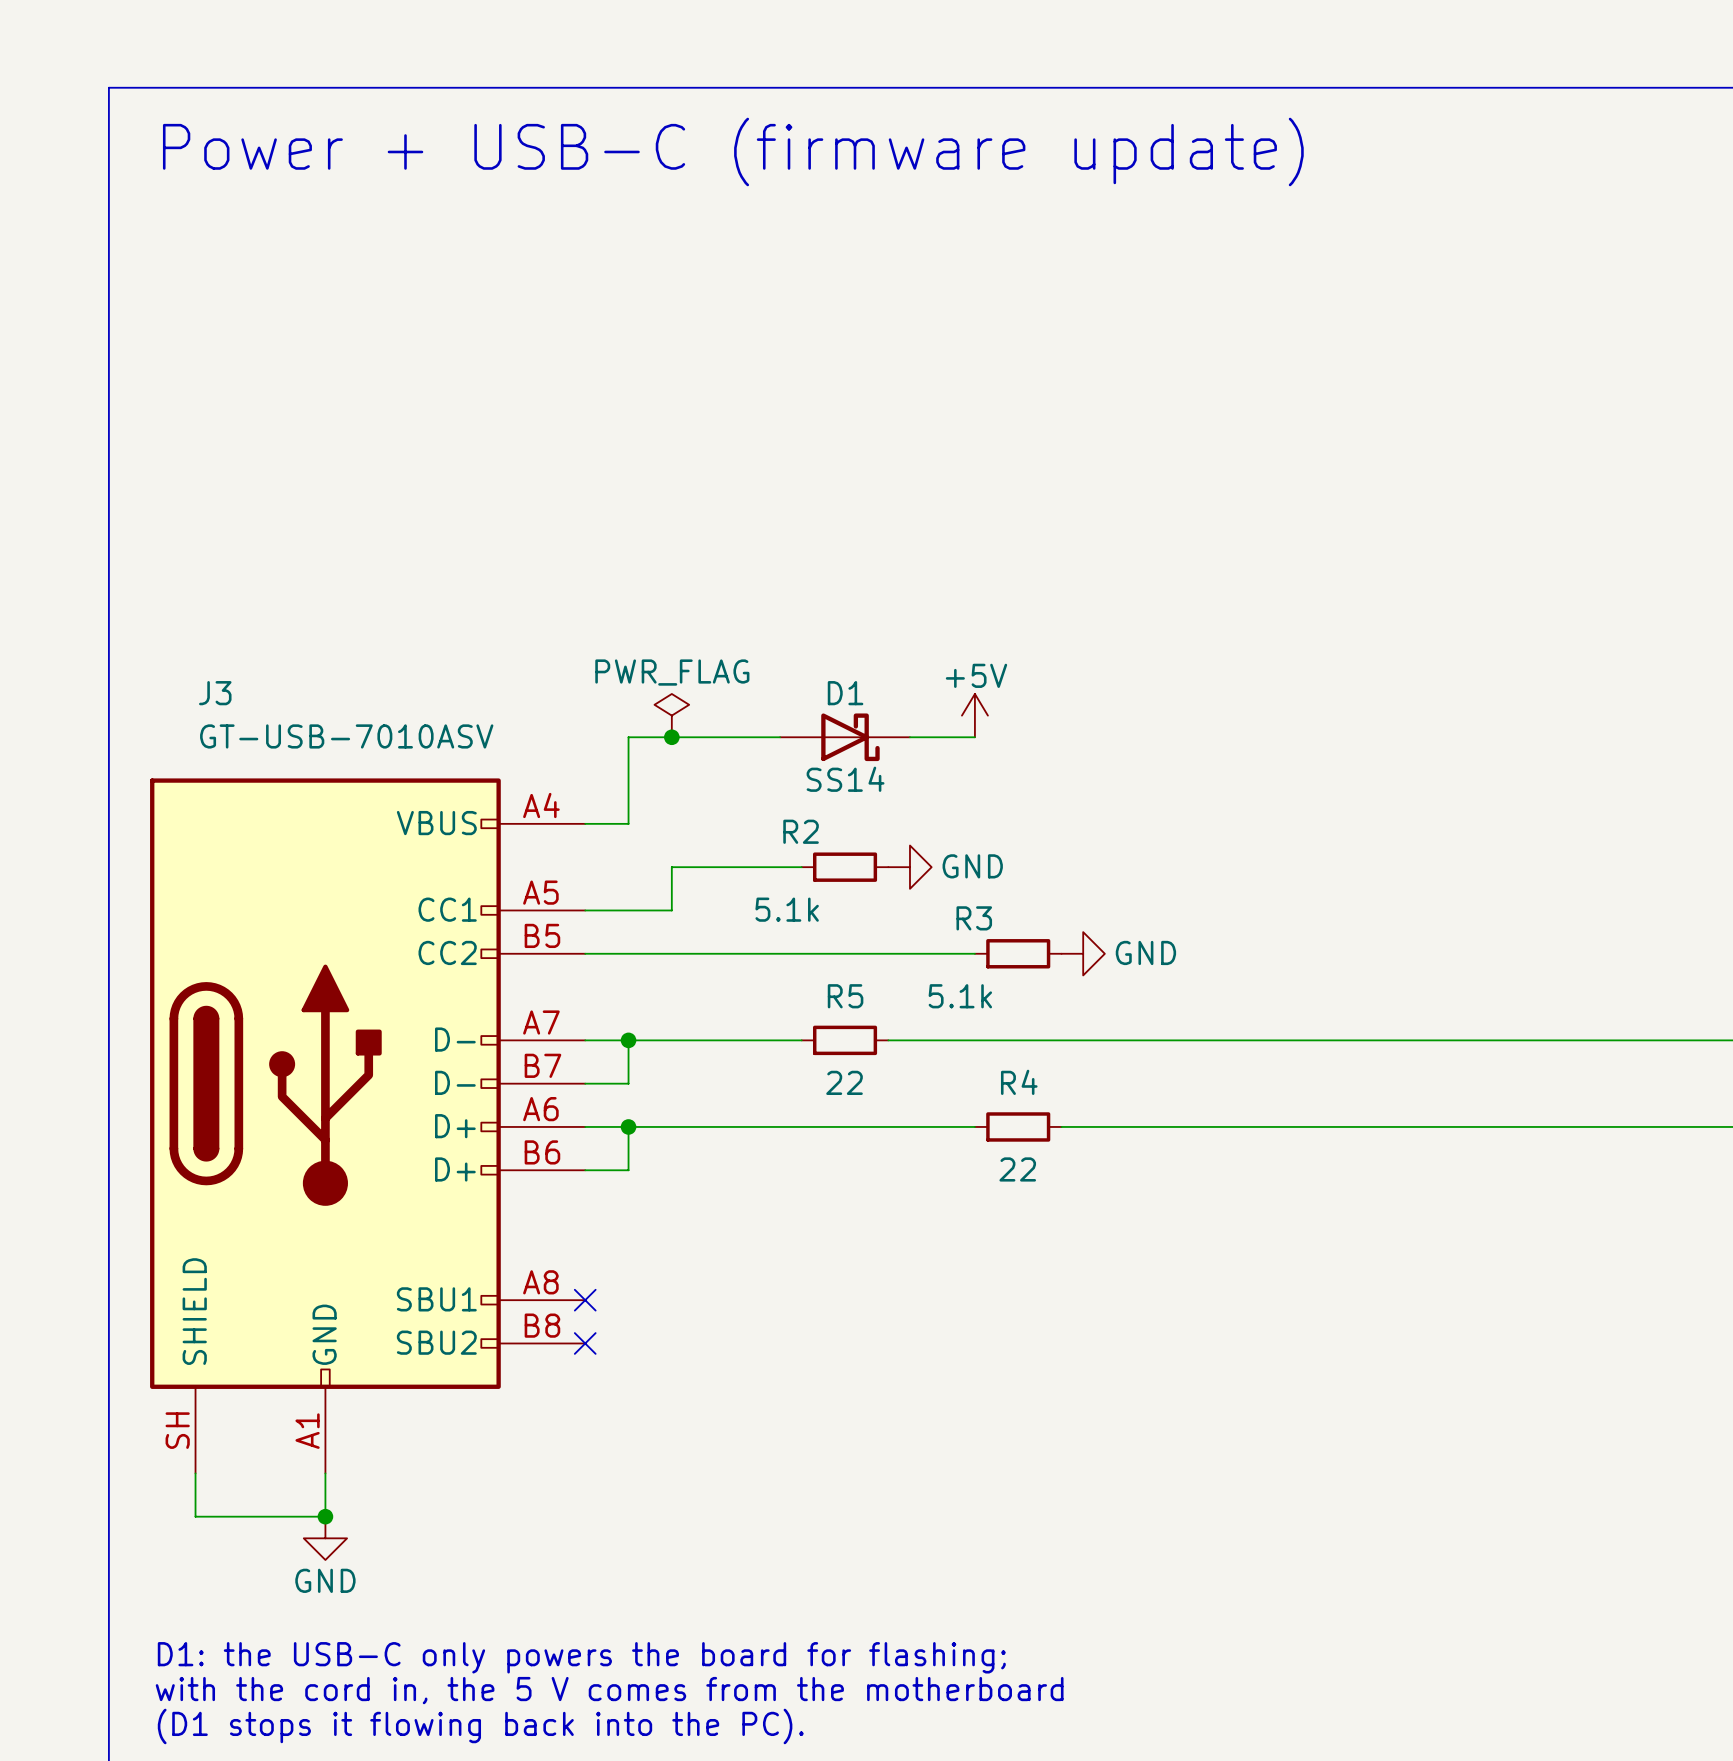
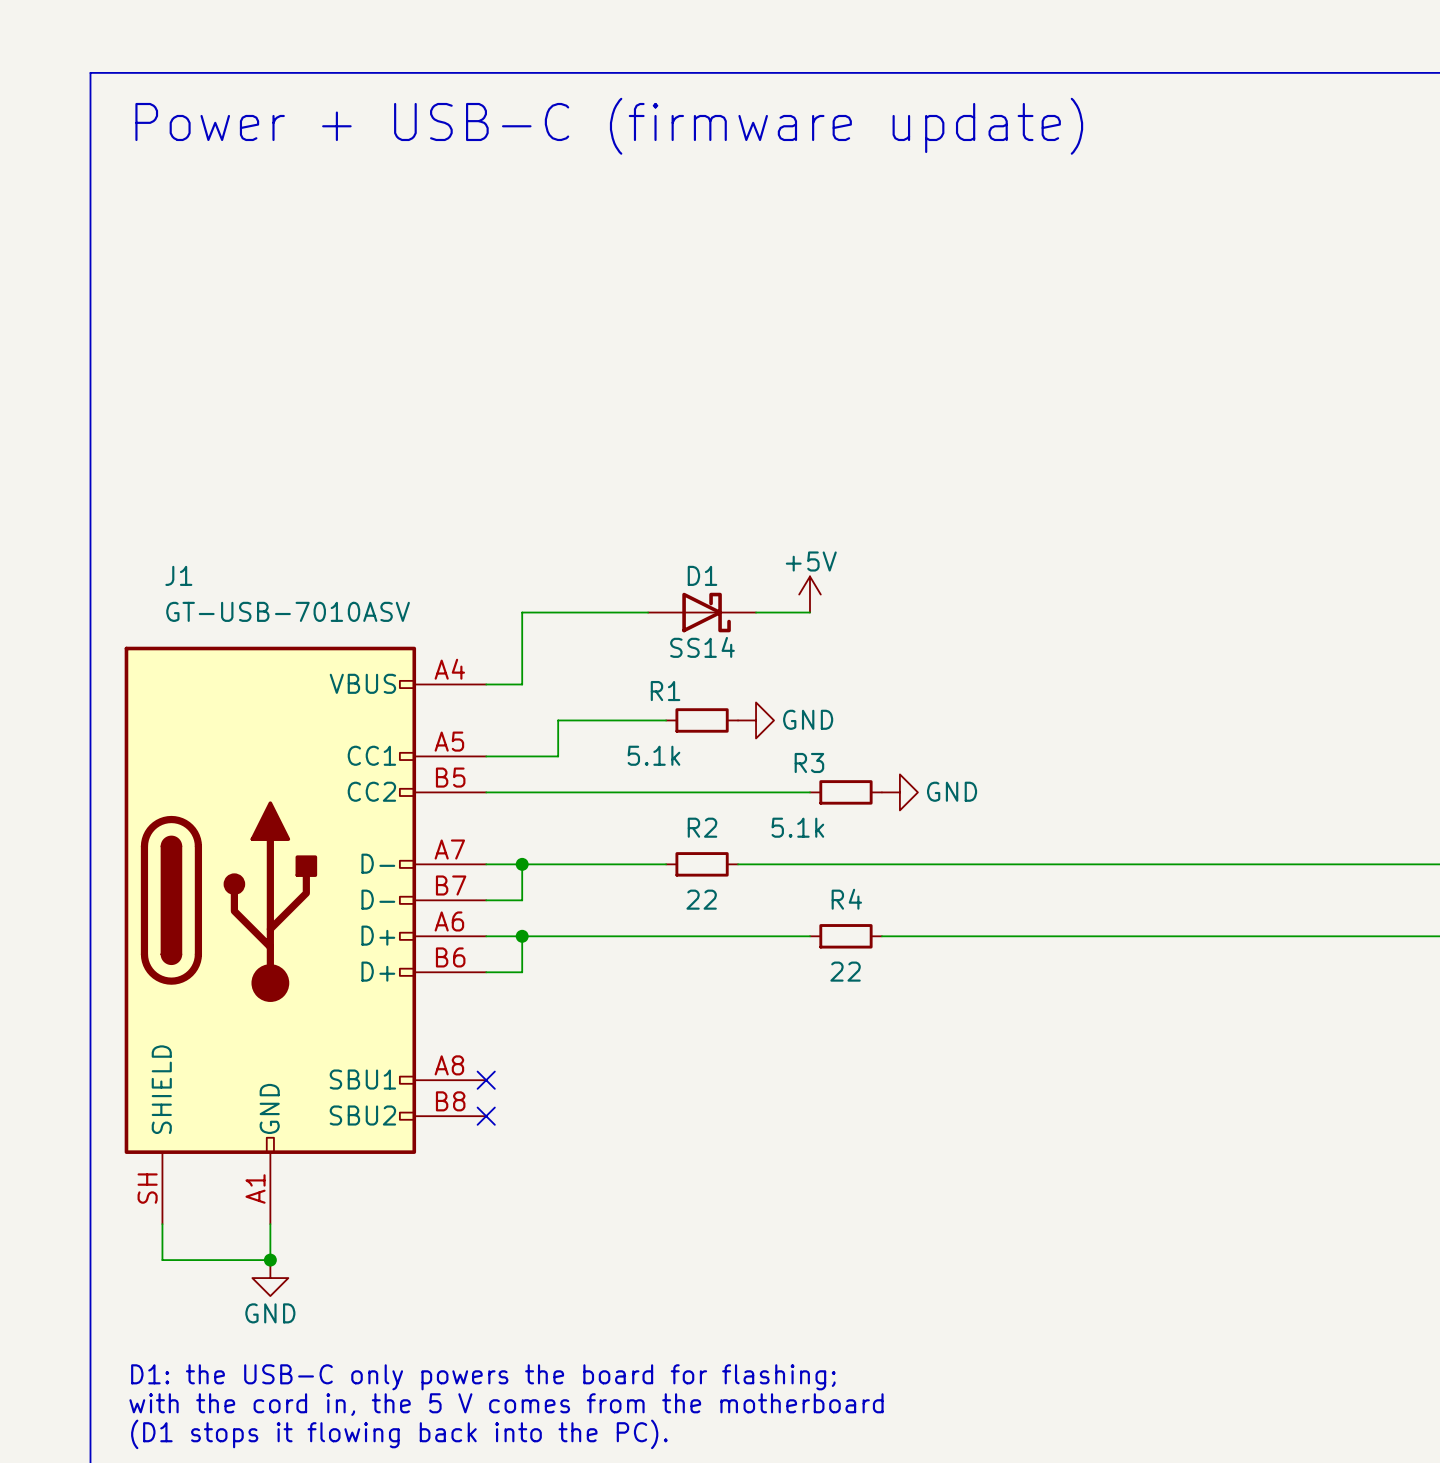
J3 name: J3 (215, 693) -> J1 (178, 575)
power symbol: PWR_FLAG (671, 715) -> none
junction: (671, 737) -> none
R2 name: R2 (801, 831) -> R1 (665, 691)
R5 name: R5 (845, 996) -> R2 (702, 827)

